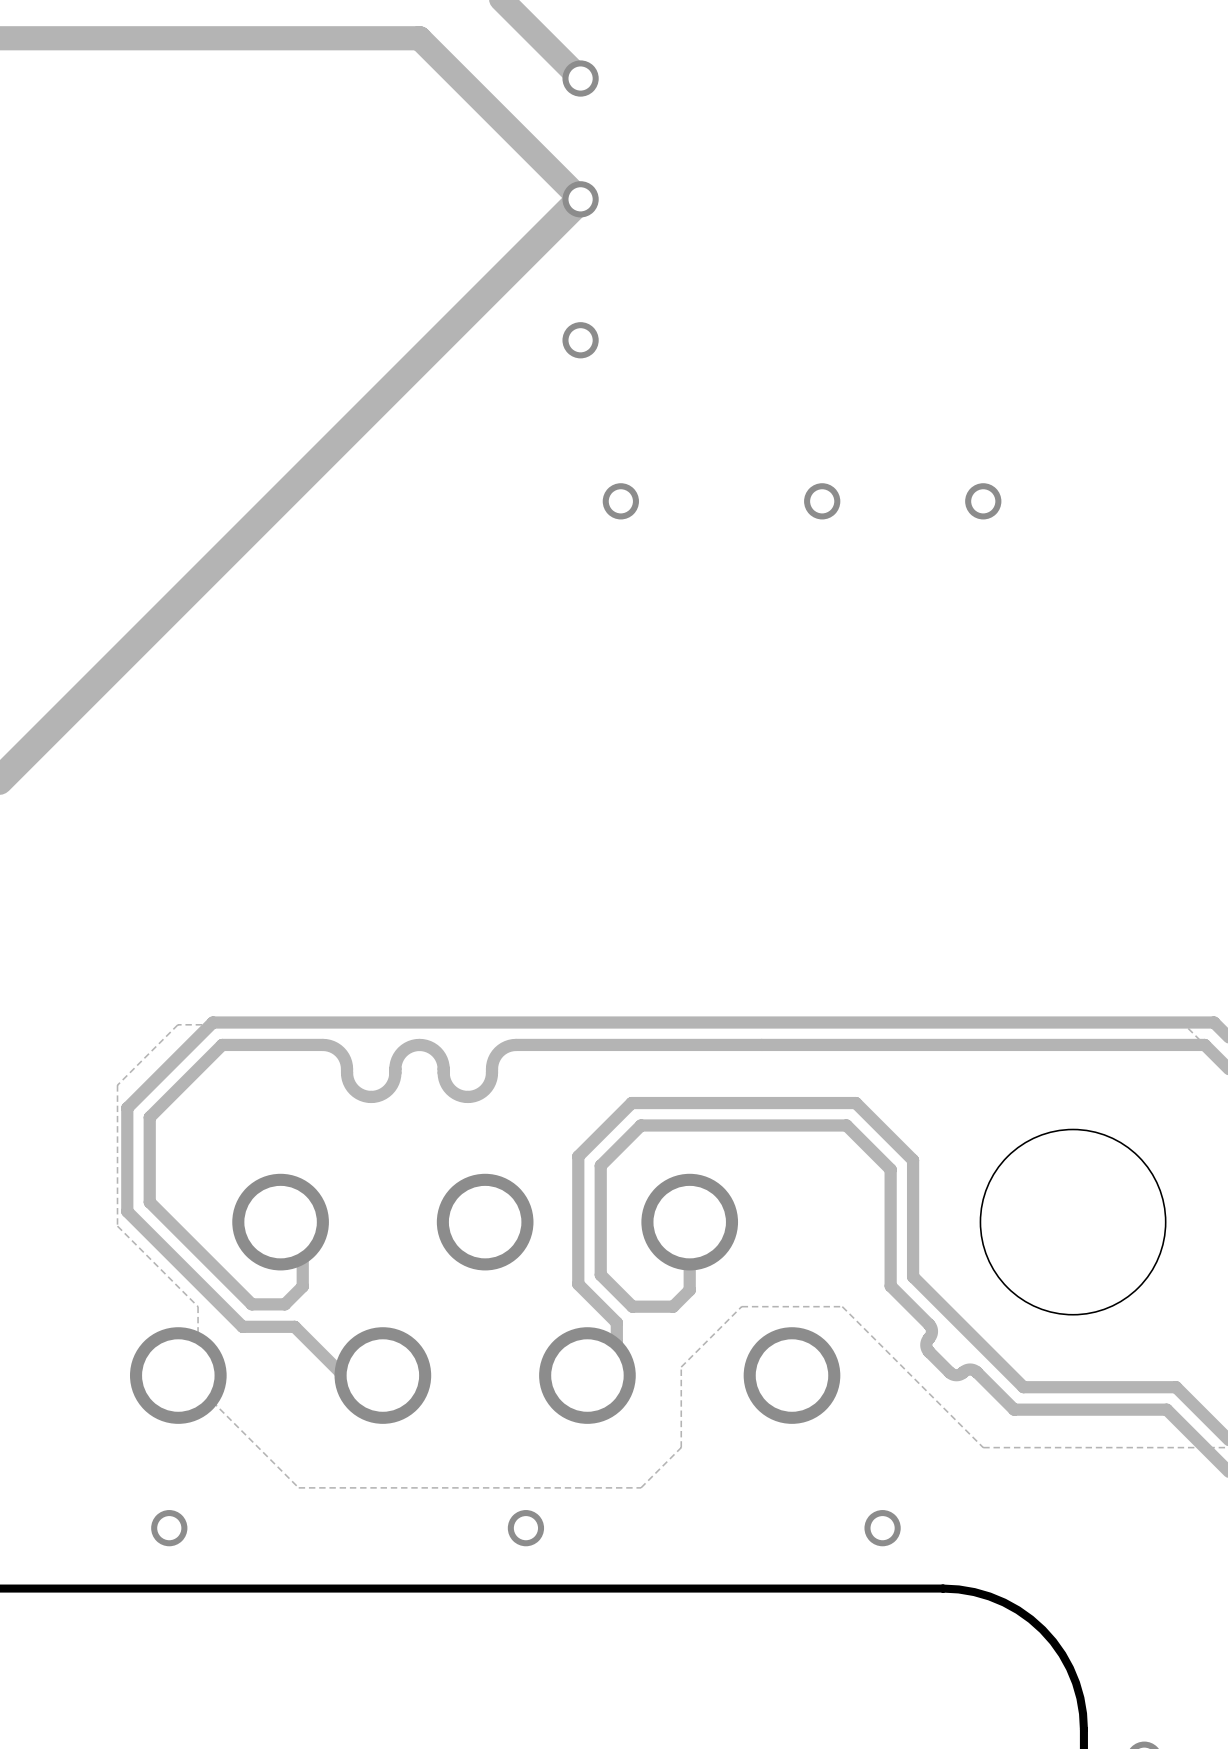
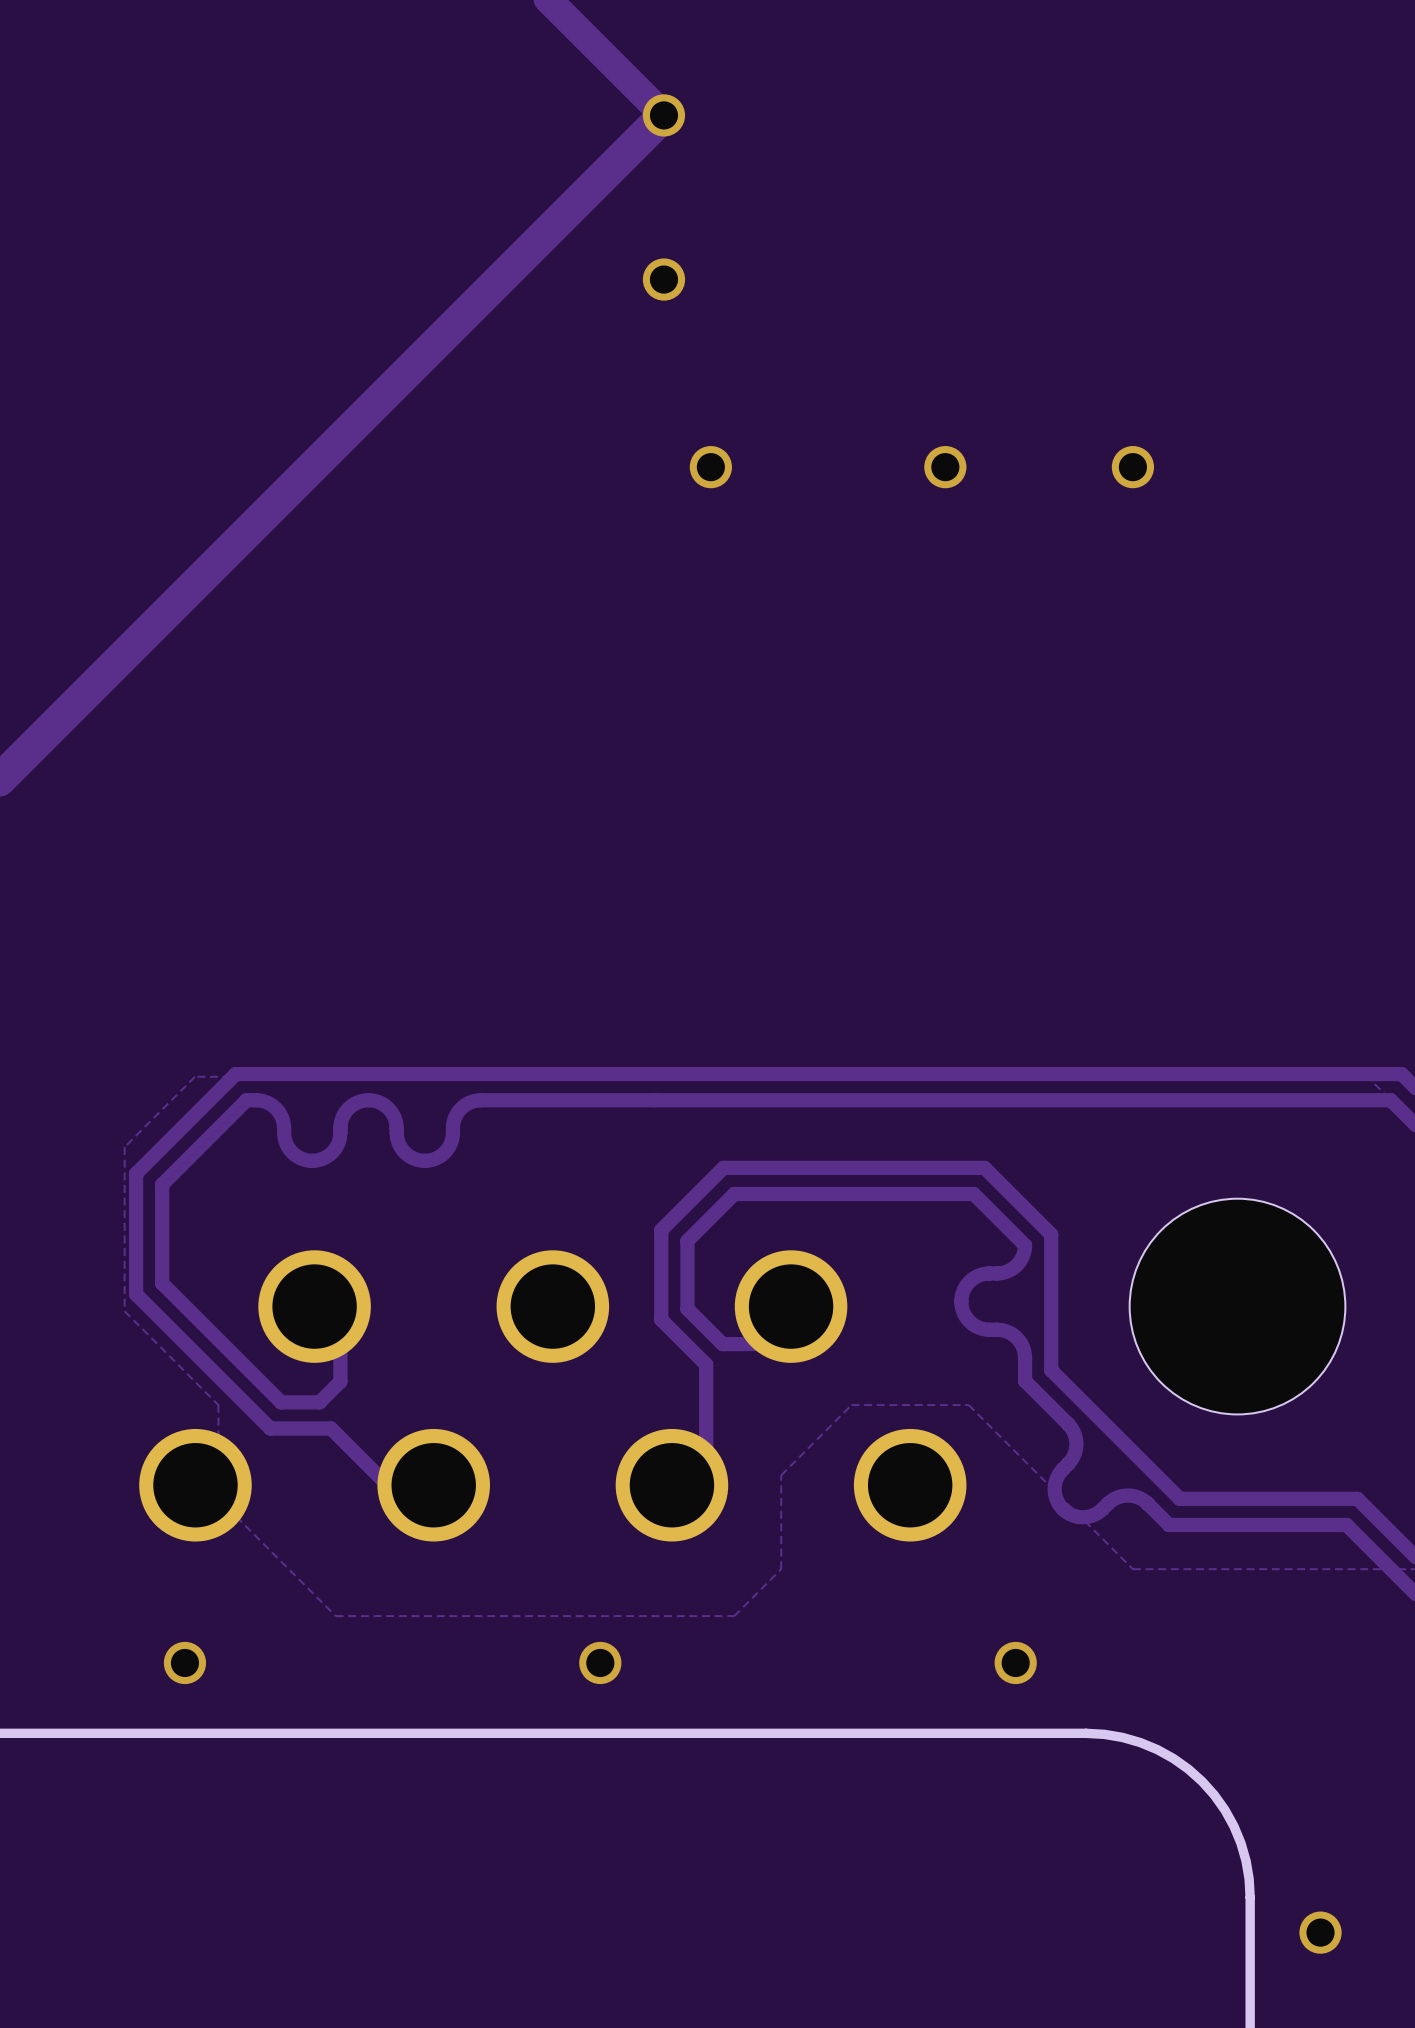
track: (230, 1044) (322, 1044) (332, 1046) (339, 1052) (345, 1059) (347, 1079) (352, 1087) (359, 1093) (371, 1096) (380, 1095) (390, 1087) (394, 1079) (397, 1059) (402, 1052) (413, 1045) (425, 1045) (434, 1049) (440, 1057) (444, 1079) (448, 1087) (455, 1093) (467, 1096) (479, 1093) (487, 1087) (491, 1079) (493, 1059) (499, 1052) (506, 1046) (516, 1044) -> (255, 1100) (266, 1102) (275, 1108) (281, 1117) (285, 1139) (289, 1149) (298, 1157) (312, 1160) (326, 1157) (334, 1149) (339, 1139) (342, 1117) (351, 1106) (364, 1100) (379, 1102) (388, 1108) (394, 1117) (397, 1139) (402, 1149) (410, 1157) (424, 1160) (435, 1158) (447, 1149) (451, 1139) (455, 1117) (461, 1108) (470, 1102) (481, 1100) (588, 1100)
track: (890, 1169) (890, 1266) -> (1025, 1245) (1021, 1259) (1011, 1269) (1000, 1273) (982, 1274) (969, 1281) (963, 1290) (961, 1301) (963, 1312) (969, 1321) (982, 1328) (1000, 1329) (1011, 1333) (1021, 1343) (1025, 1357)
track: (689, 1222) (689, 1290) (673, 1306) (632, 1306) (600, 1274) (600, 1224) -> (791, 1306) (753, 1344) (722, 1344) (687, 1308)
track: (578, 1233) (578, 1284) (616, 1322) -> (661, 1319) (706, 1364) (706, 1423)
track: (927, 1323) (931, 1331) (926, 1343) (929, 1351) (951, 1373) (957, 1375) (967, 1369) (973, 1370) (996, 1391) -> (1068, 1424) (1075, 1437) (1075, 1450) (1072, 1459) (1058, 1474) (1054, 1485) (1056, 1498) (1062, 1509) (1076, 1516) (1089, 1516) (1097, 1512) (1112, 1499) (1124, 1495) (1137, 1497) (1147, 1503)

